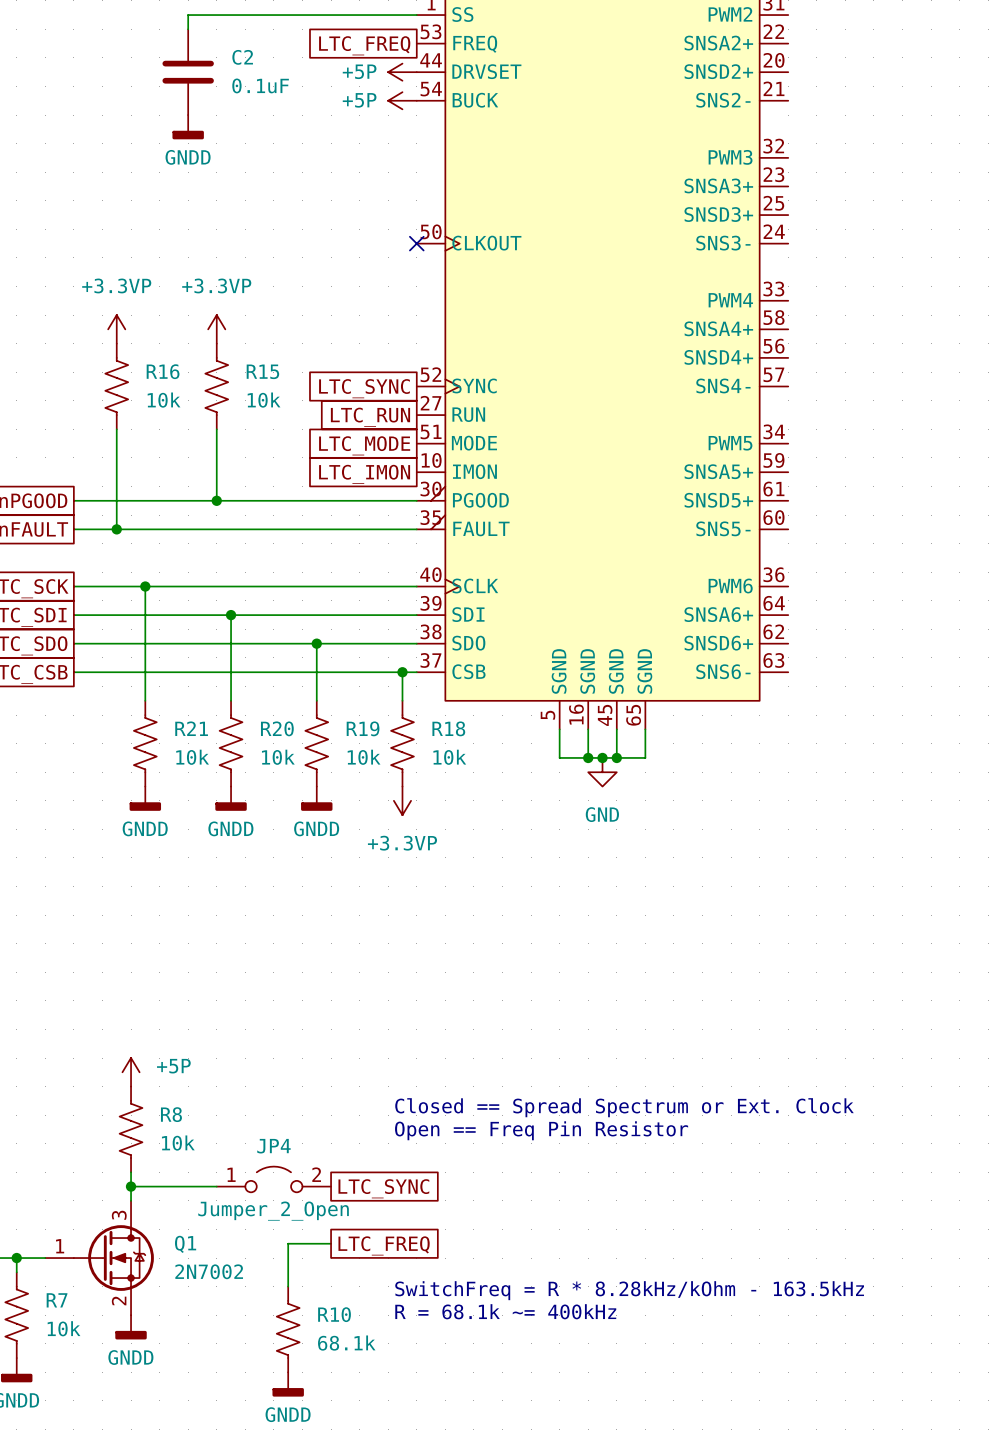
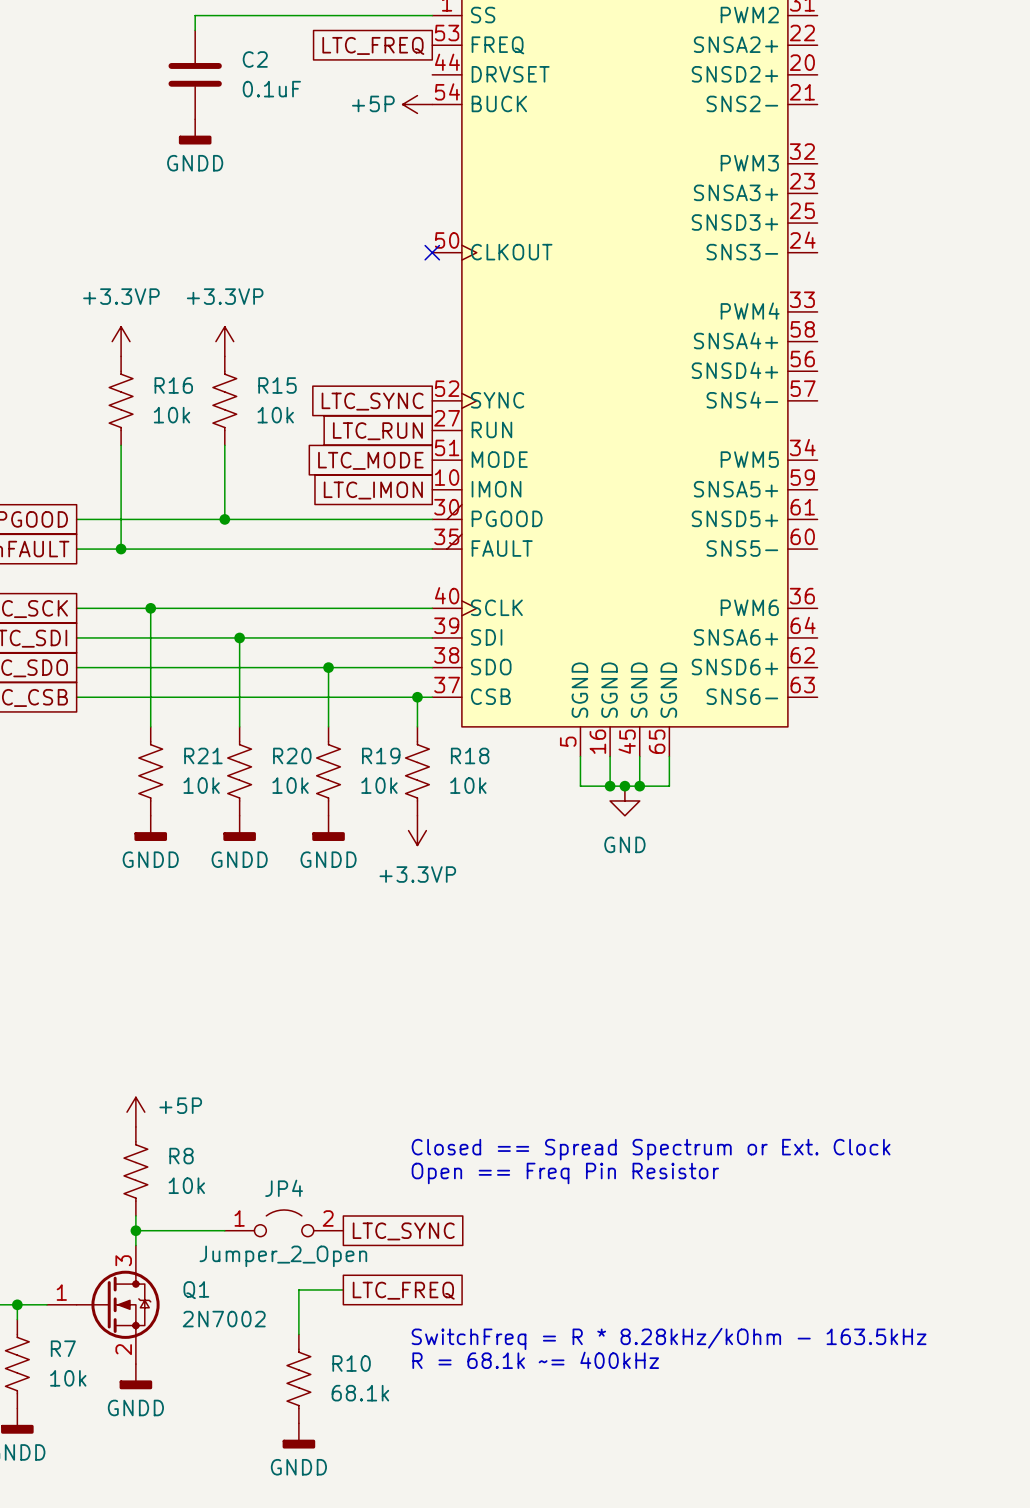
power symbol: +5P (402, 72) -> none

